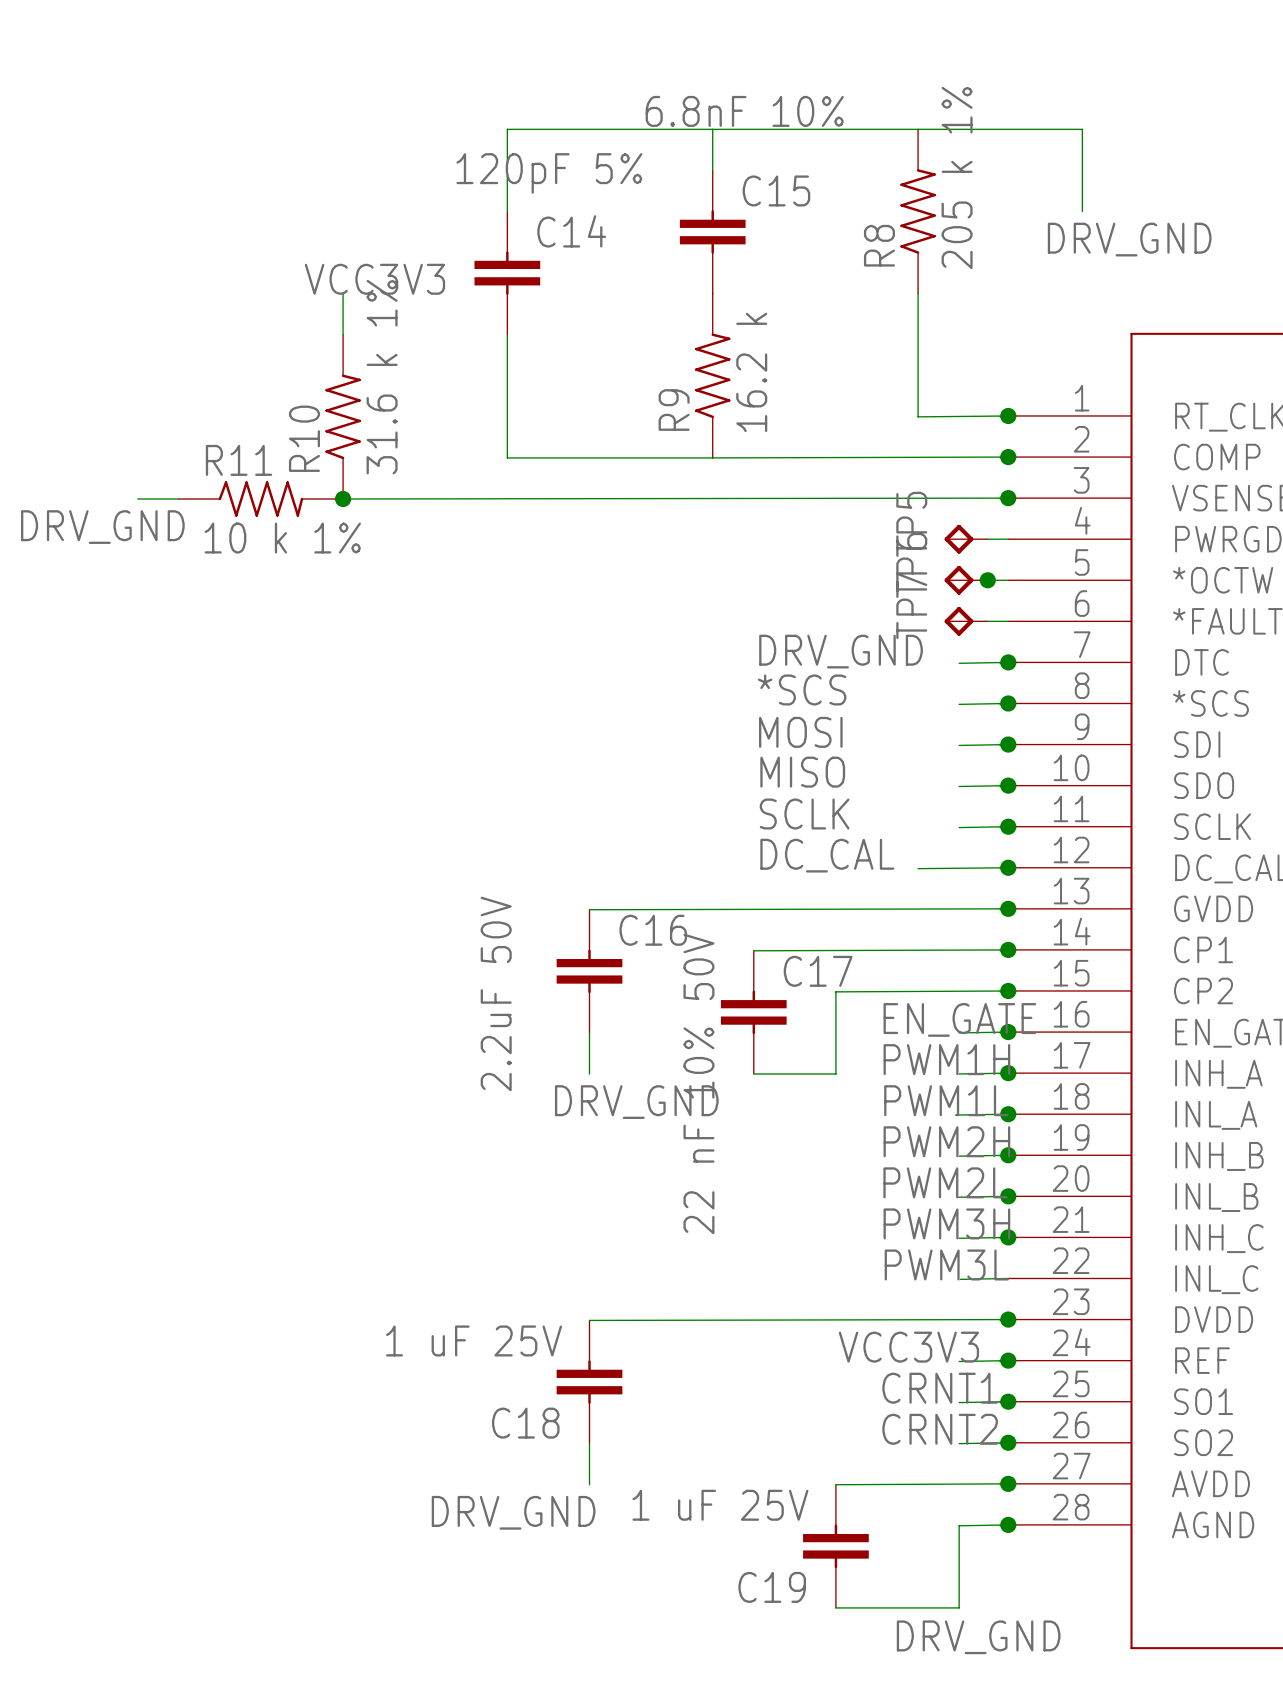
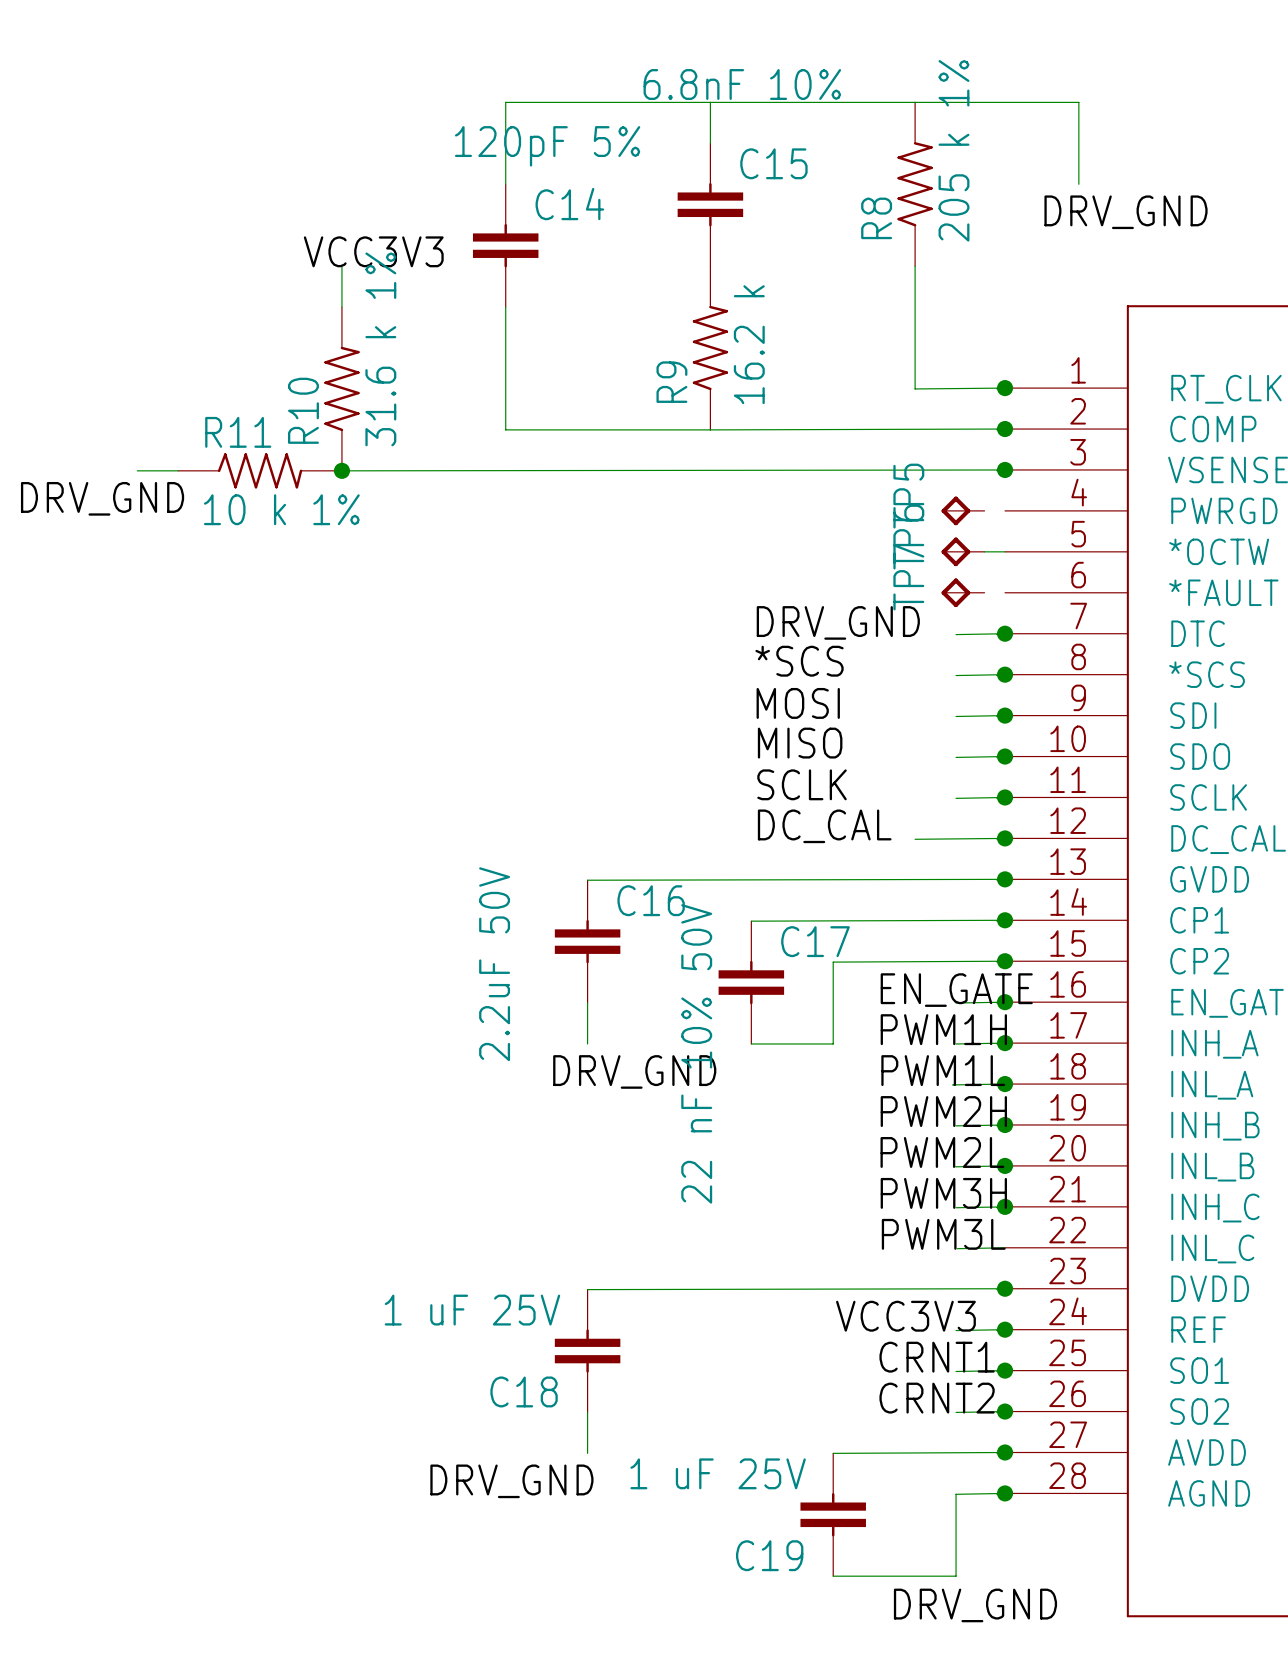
wire: (987, 539) (1008, 539) -> none
junction: (987, 580) -> none
wire: (987, 621) (1008, 621) -> none

